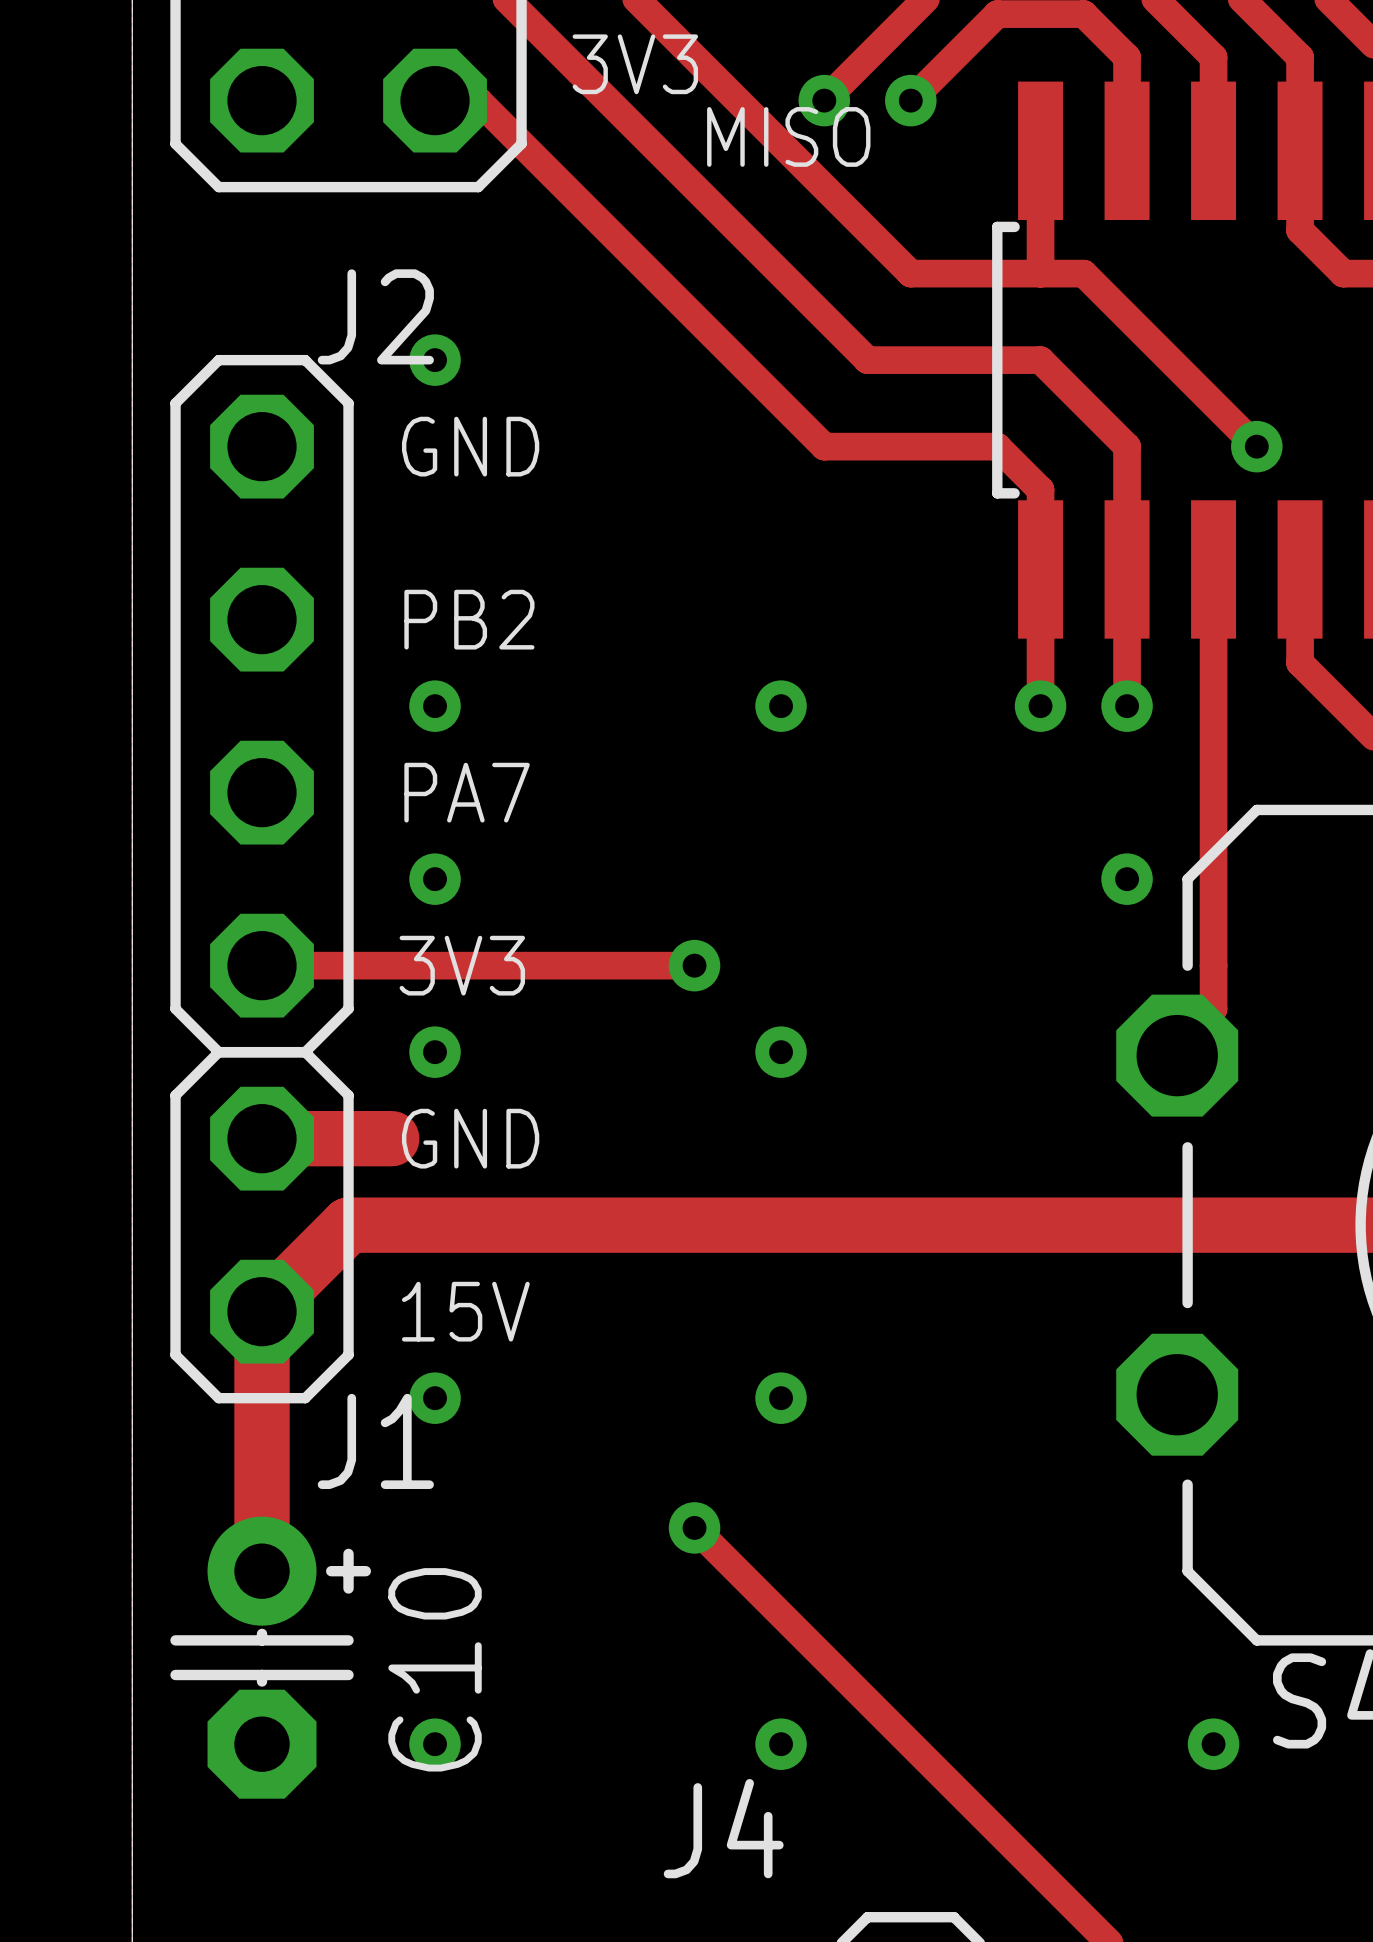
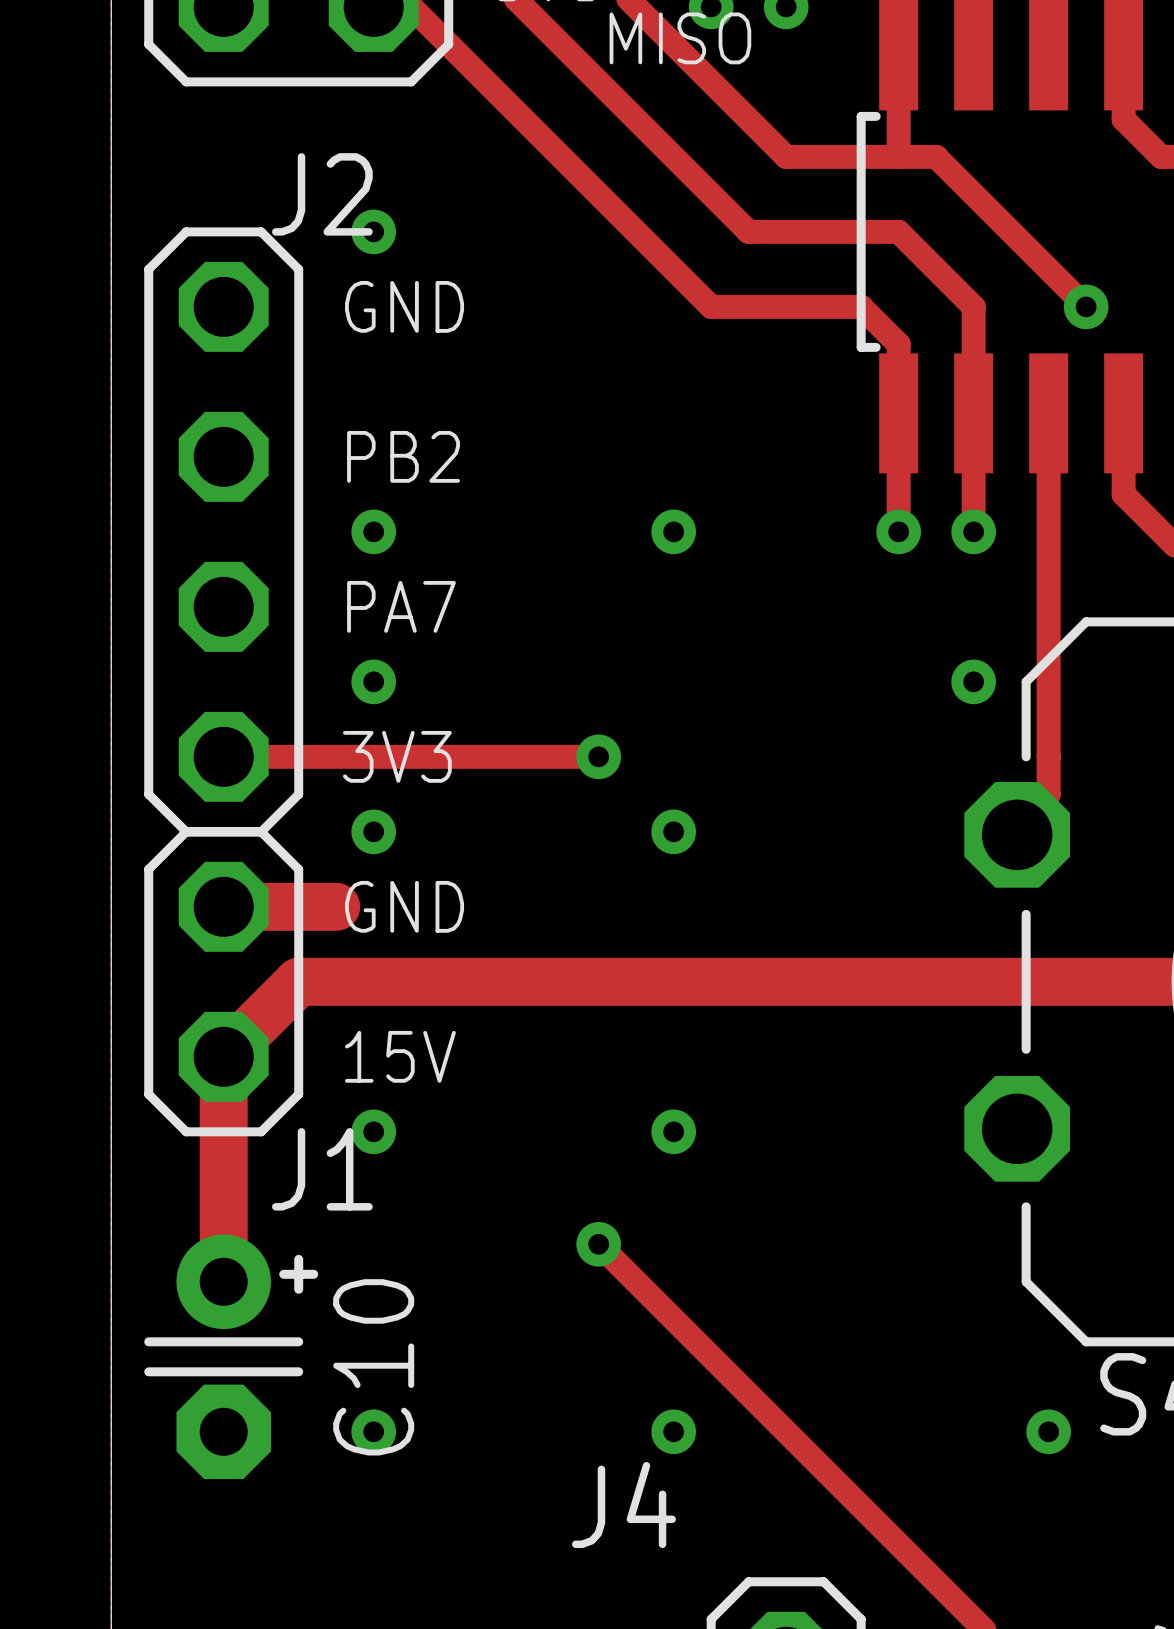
C10 footprint: [170, 1516, 372, 1799] -> [144, 1234, 319, 1480]

